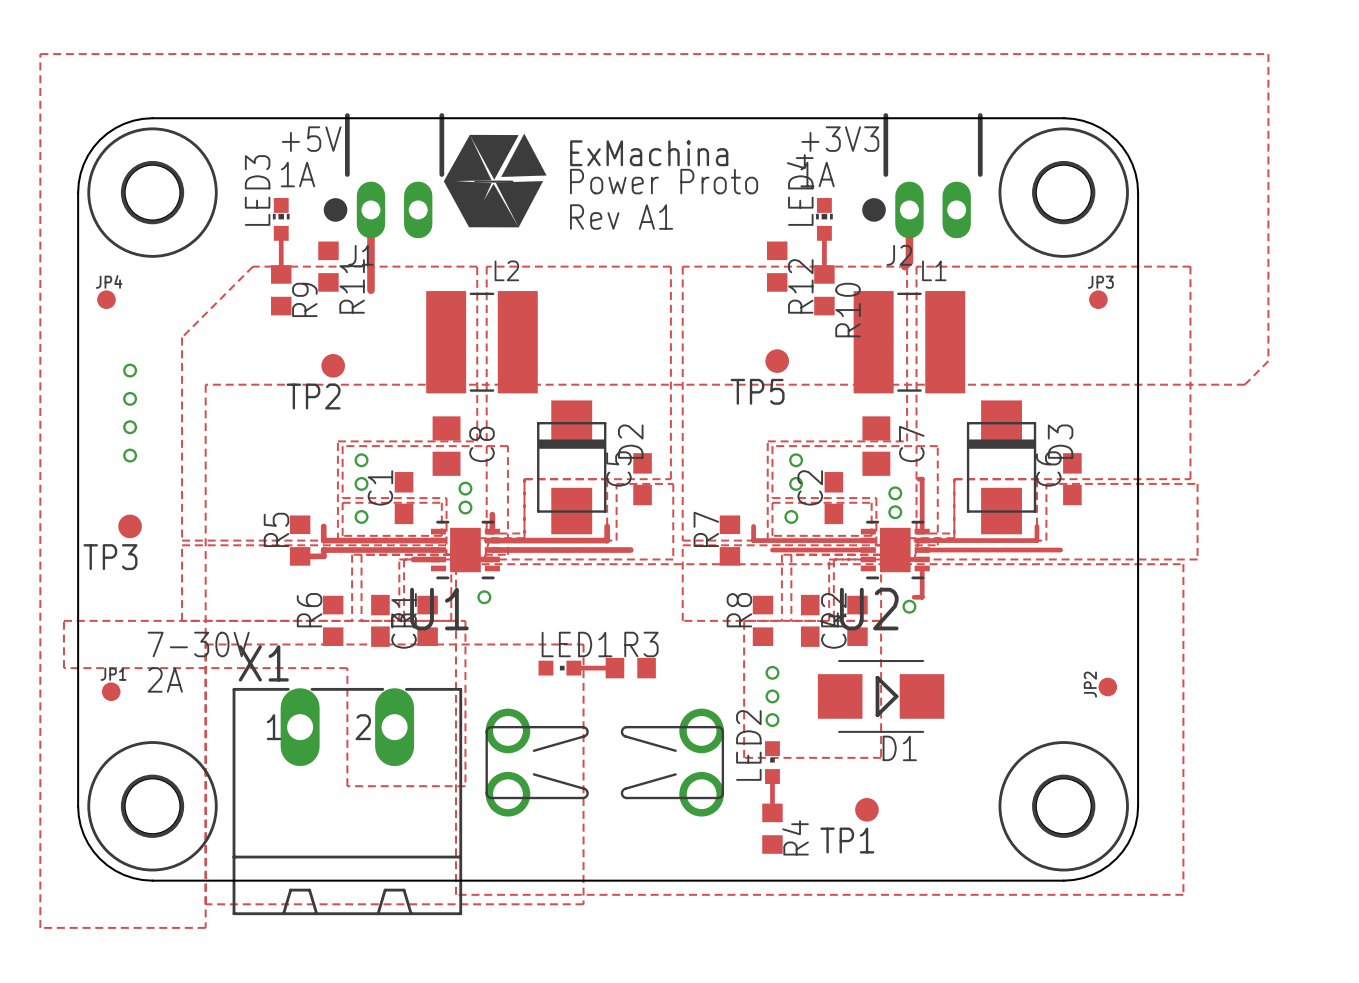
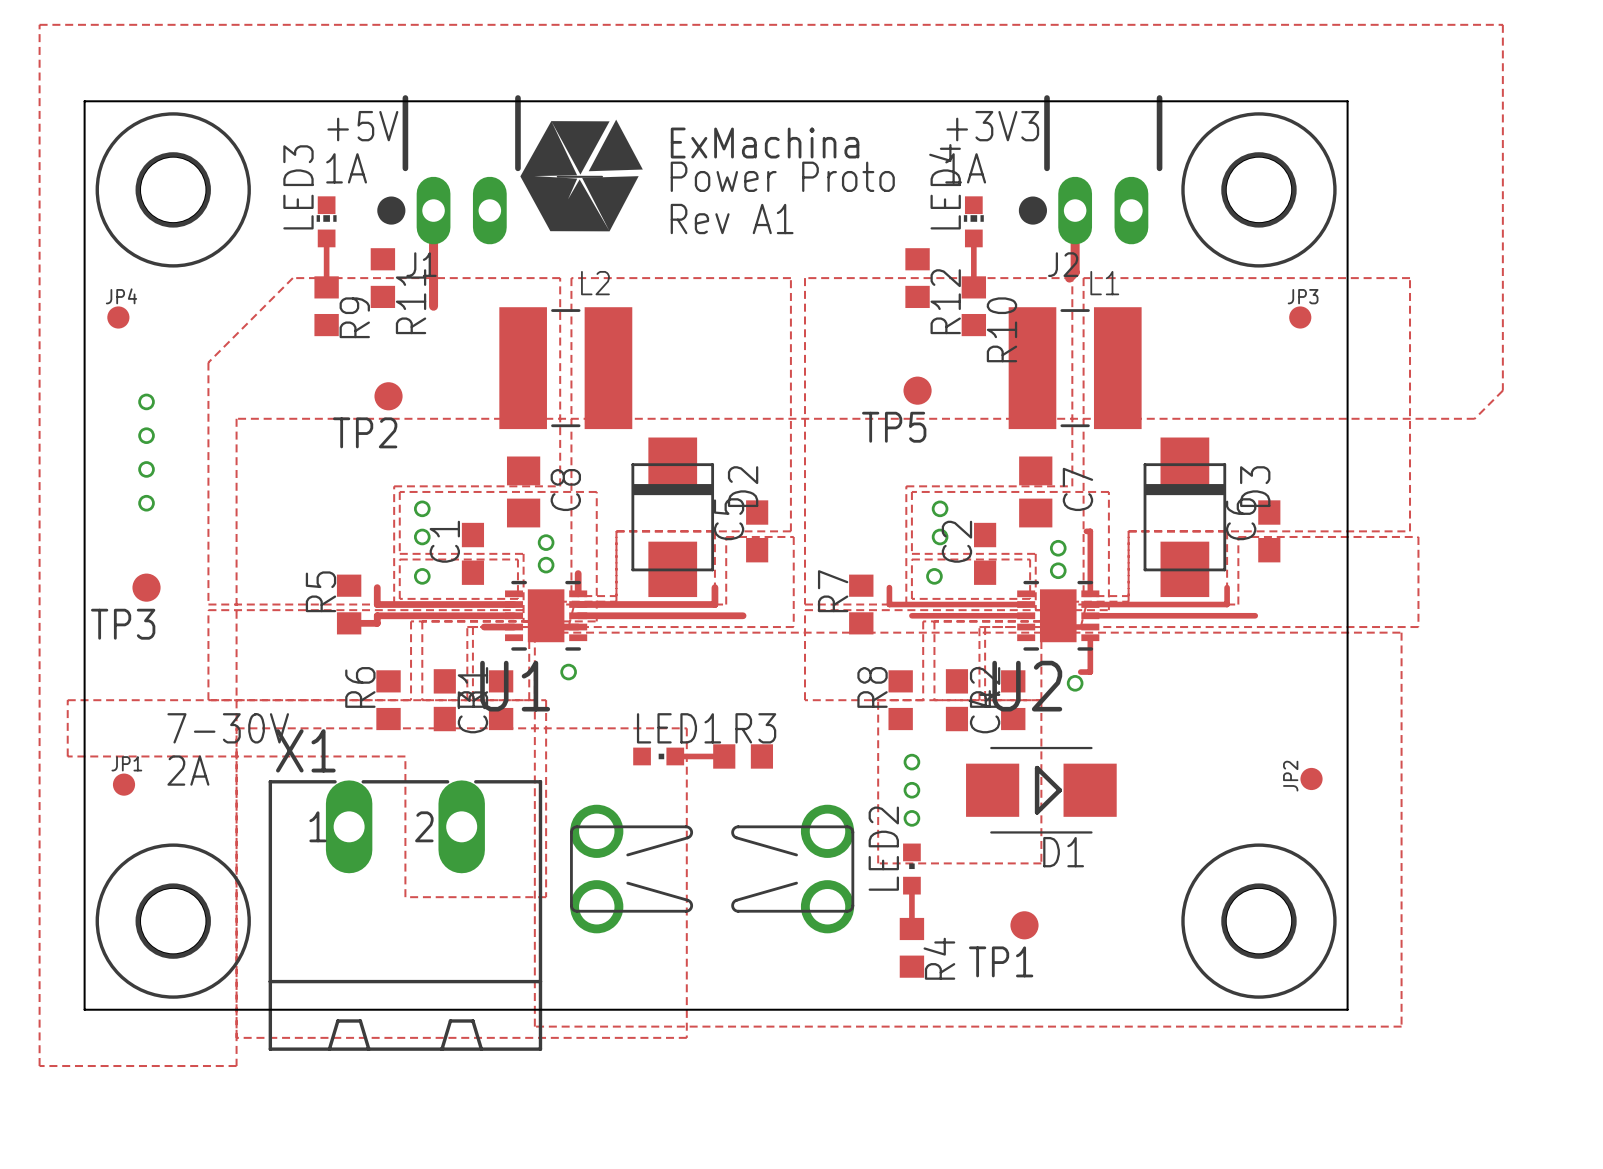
board edge: (152, 118) (124, 123) (99, 140) (83, 164) (78, 192) -> (173, 101) (84, 101) (84, 189)
board edge: (1063, 118) (1092, 123) (1116, 140) (1132, 164) (1138, 192) -> (1258, 101) (1347, 101) (1347, 189)
board edge: (78, 806) (83, 834) (99, 858) (124, 875) (152, 880) -> (84, 921) (84, 1009) (173, 1009)
board edge: (1138, 806) (1132, 834) (1116, 858) (1092, 875) (1063, 880) -> (1347, 921) (1347, 1009) (1258, 1009)

